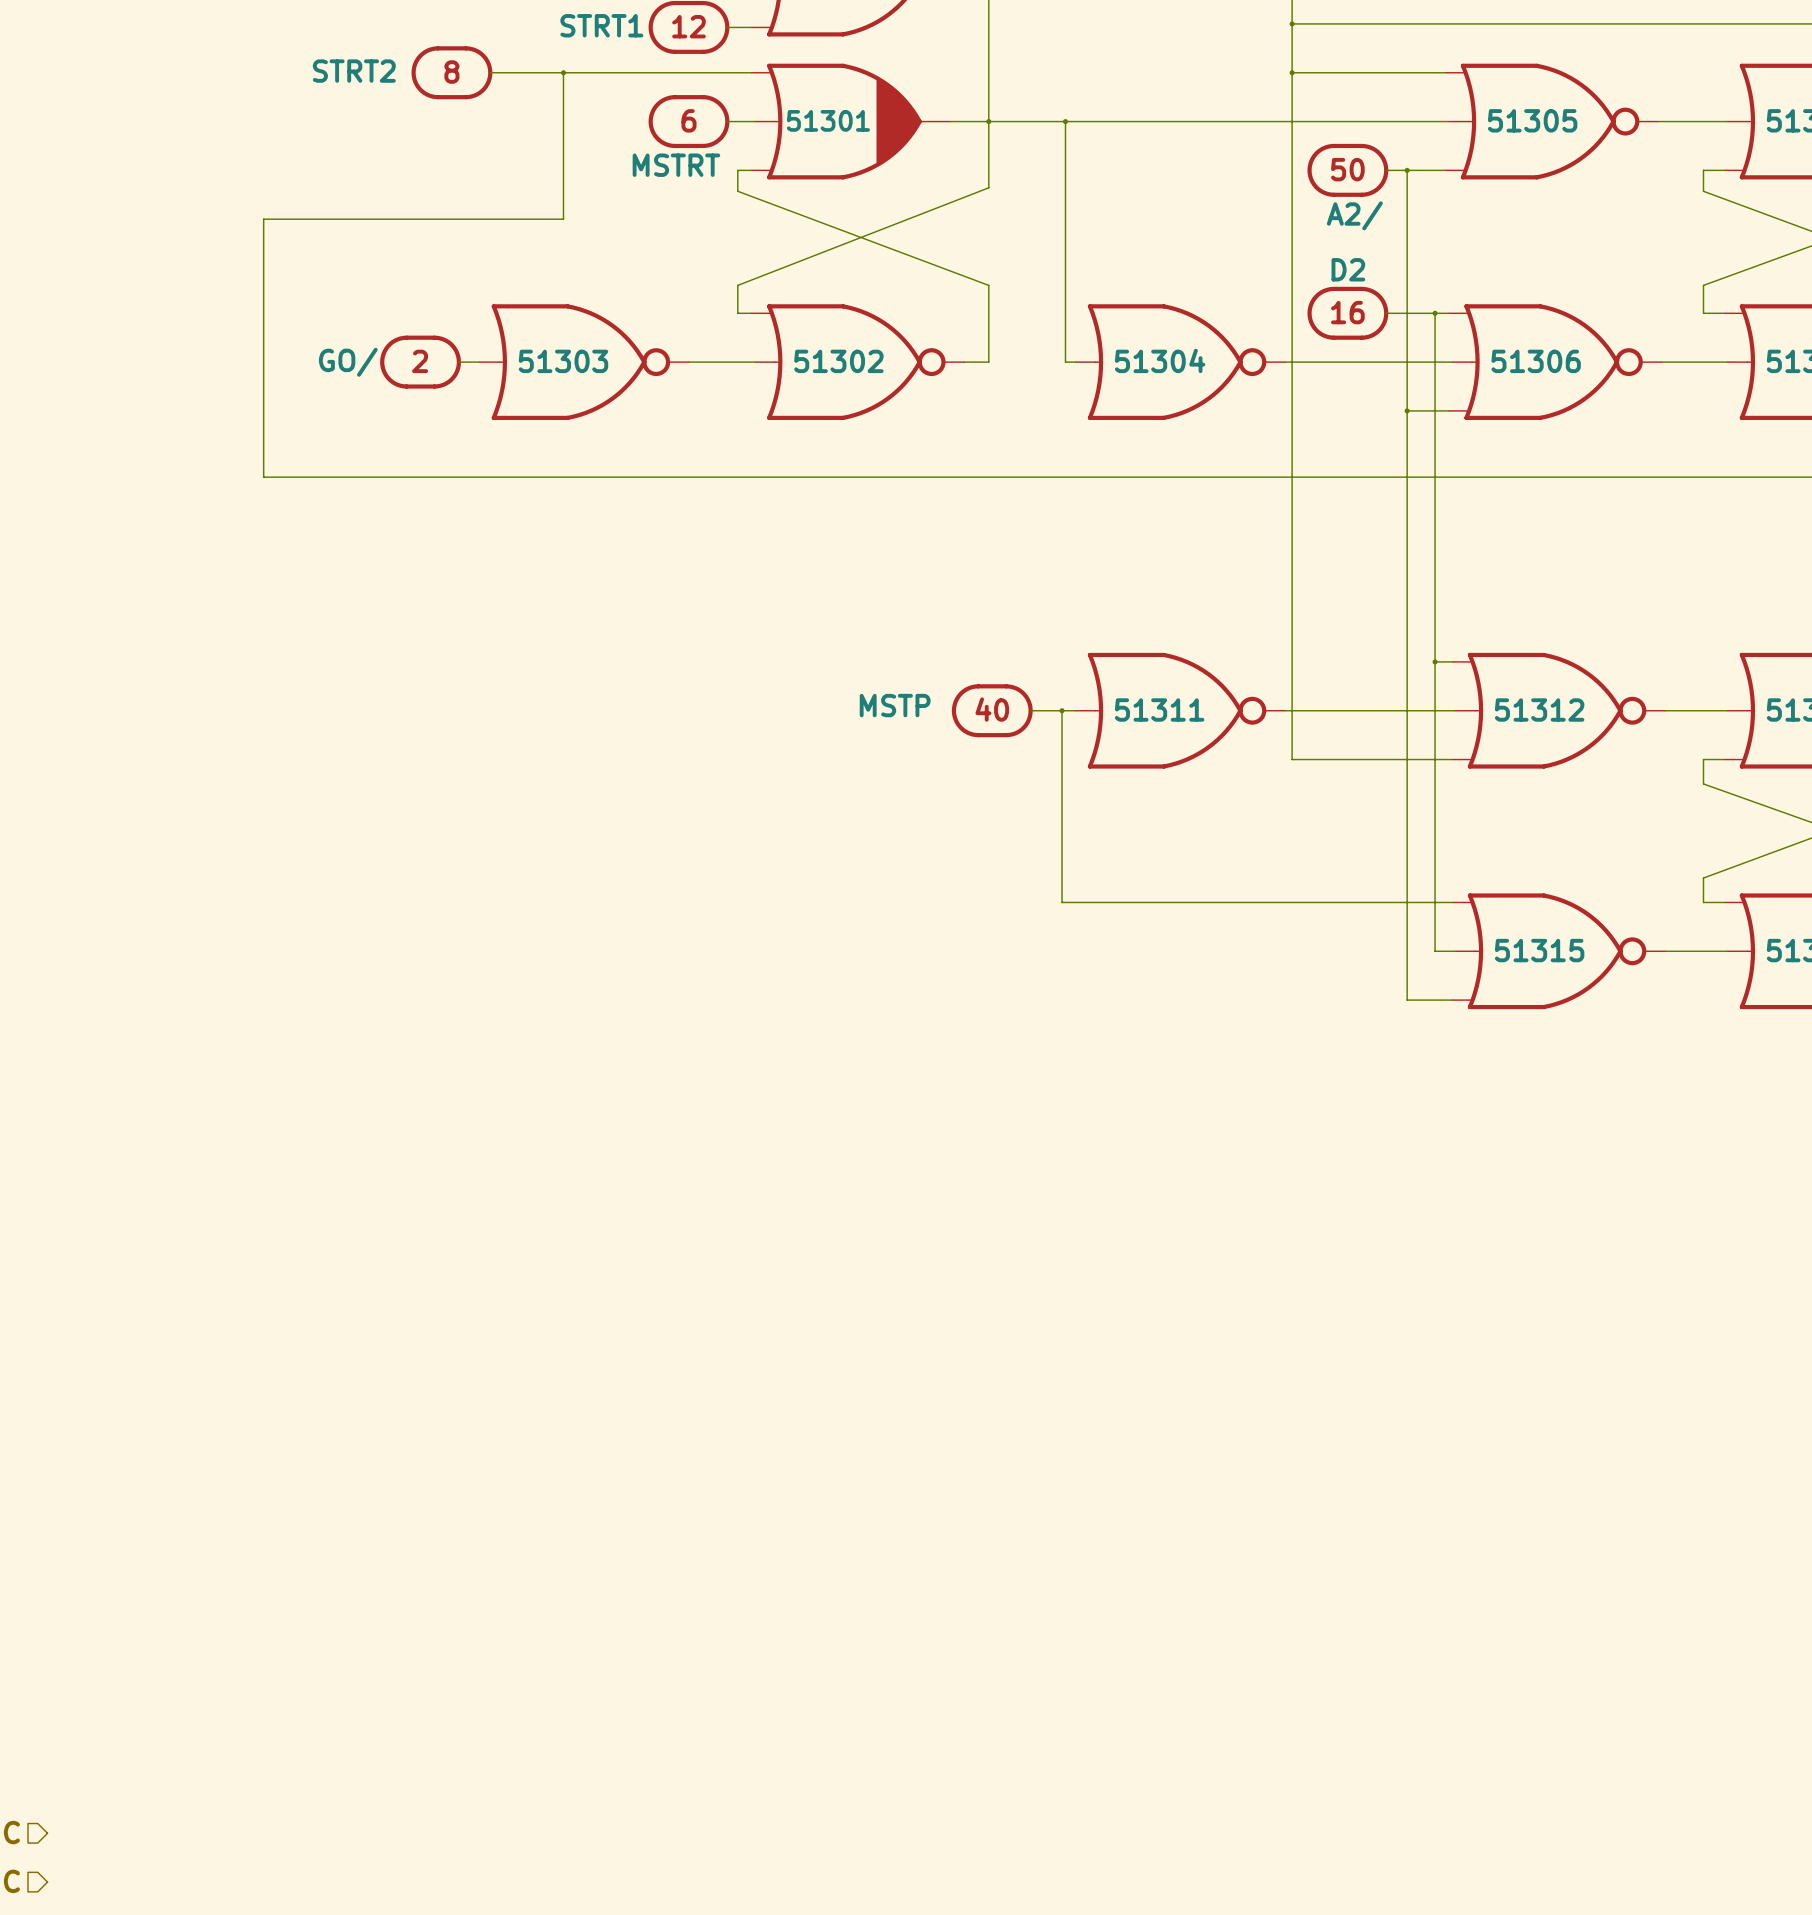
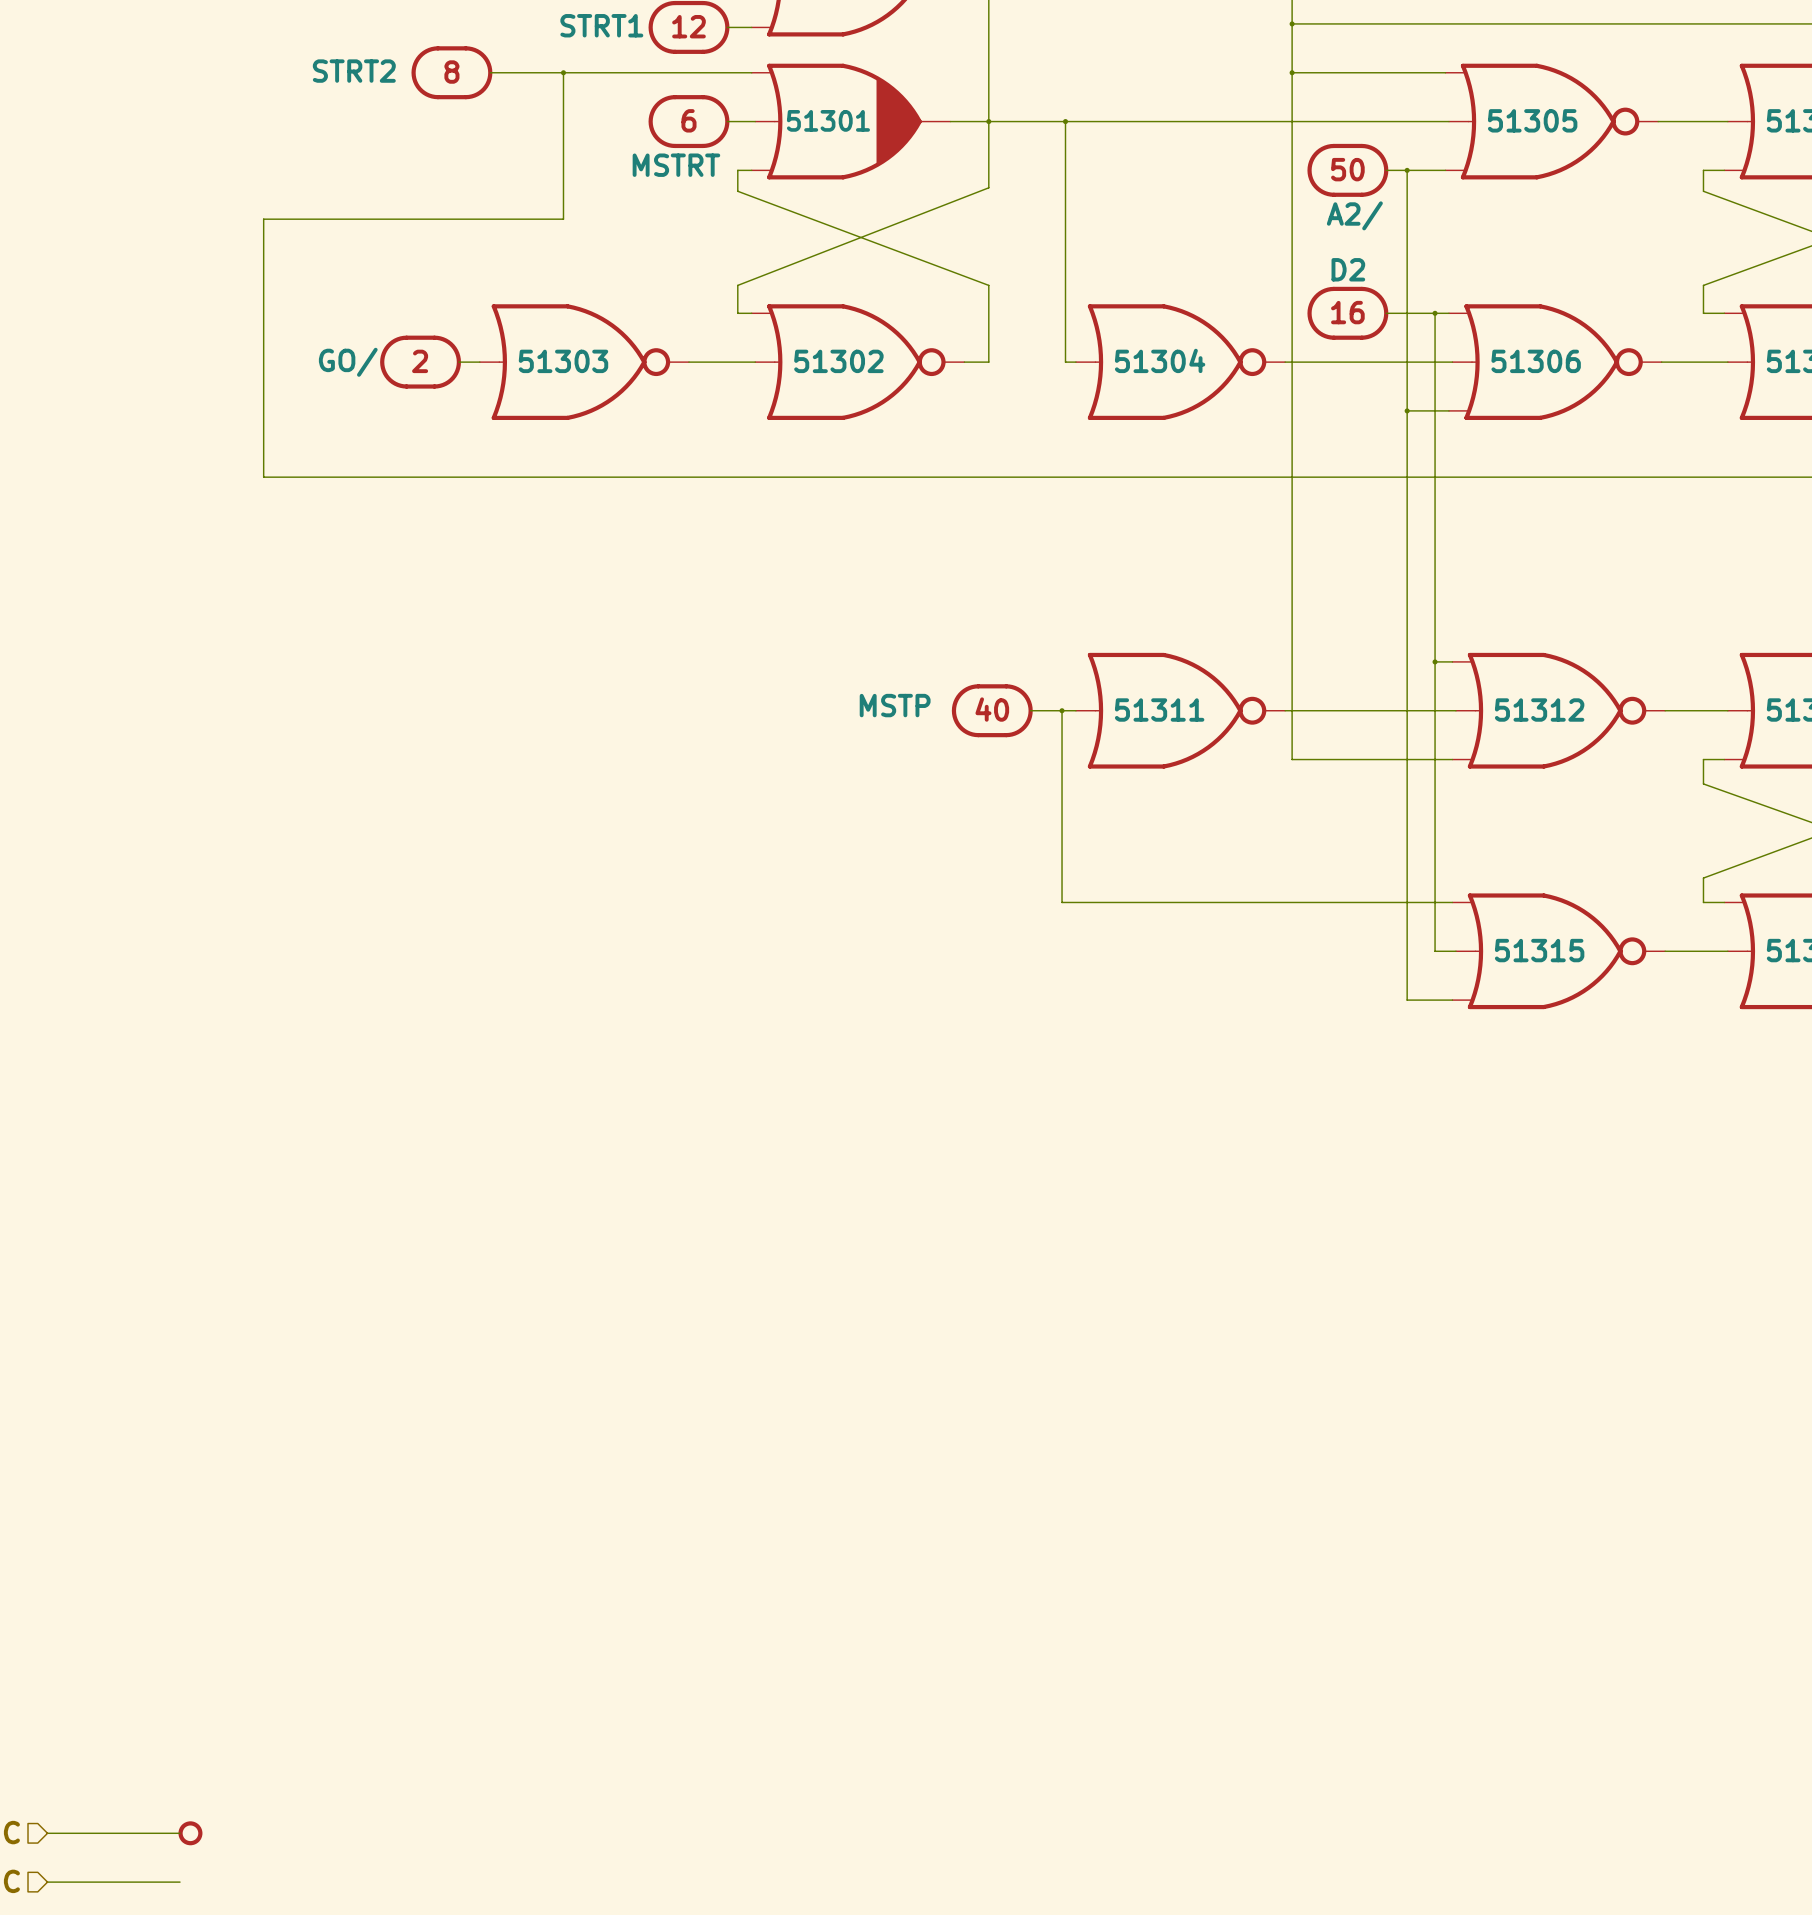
wire: none -> (47, 1833) (180, 1833)
part: none -> (190, 1833)
wire: none -> (47, 1882) (180, 1882)

